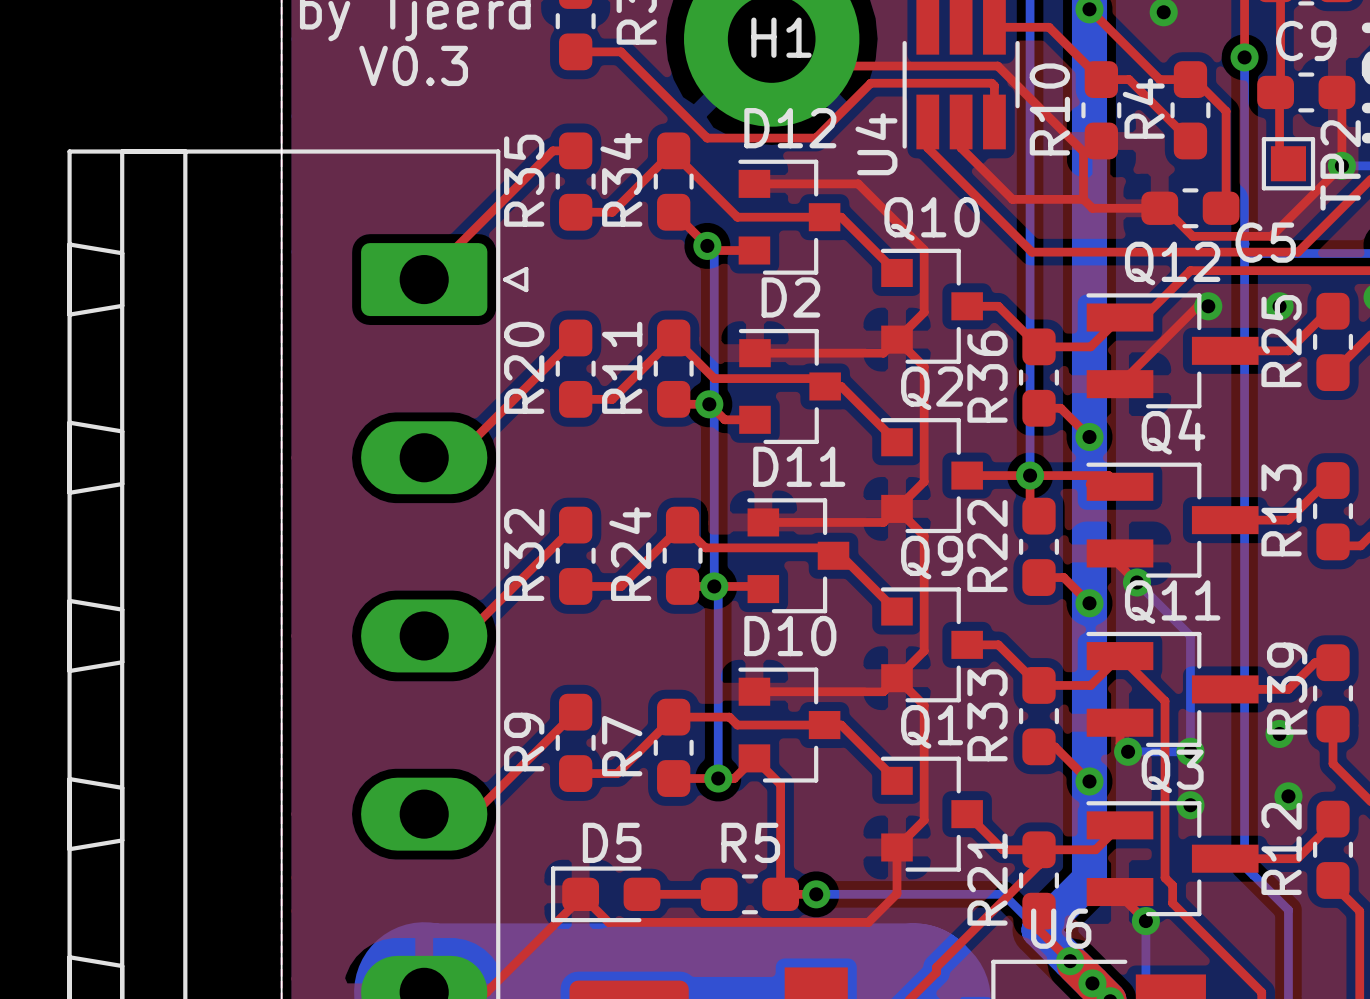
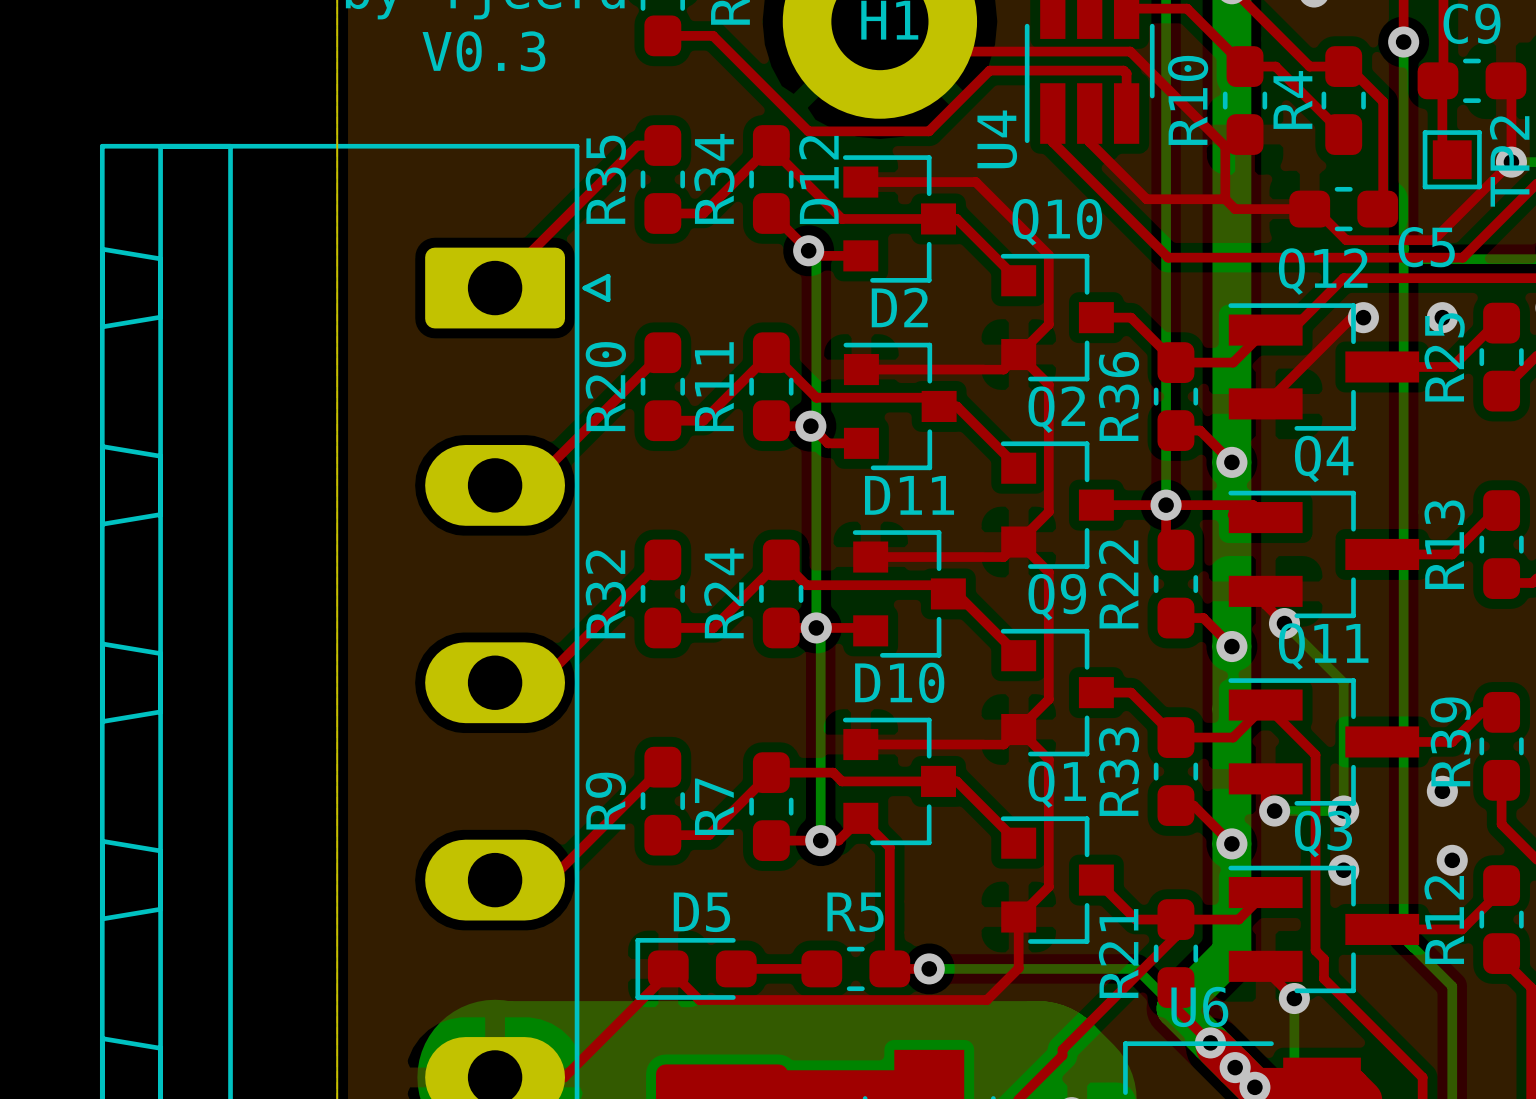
D12 name rotation: 0° (790, 128) -> 90° counterclockwise (818, 179)

